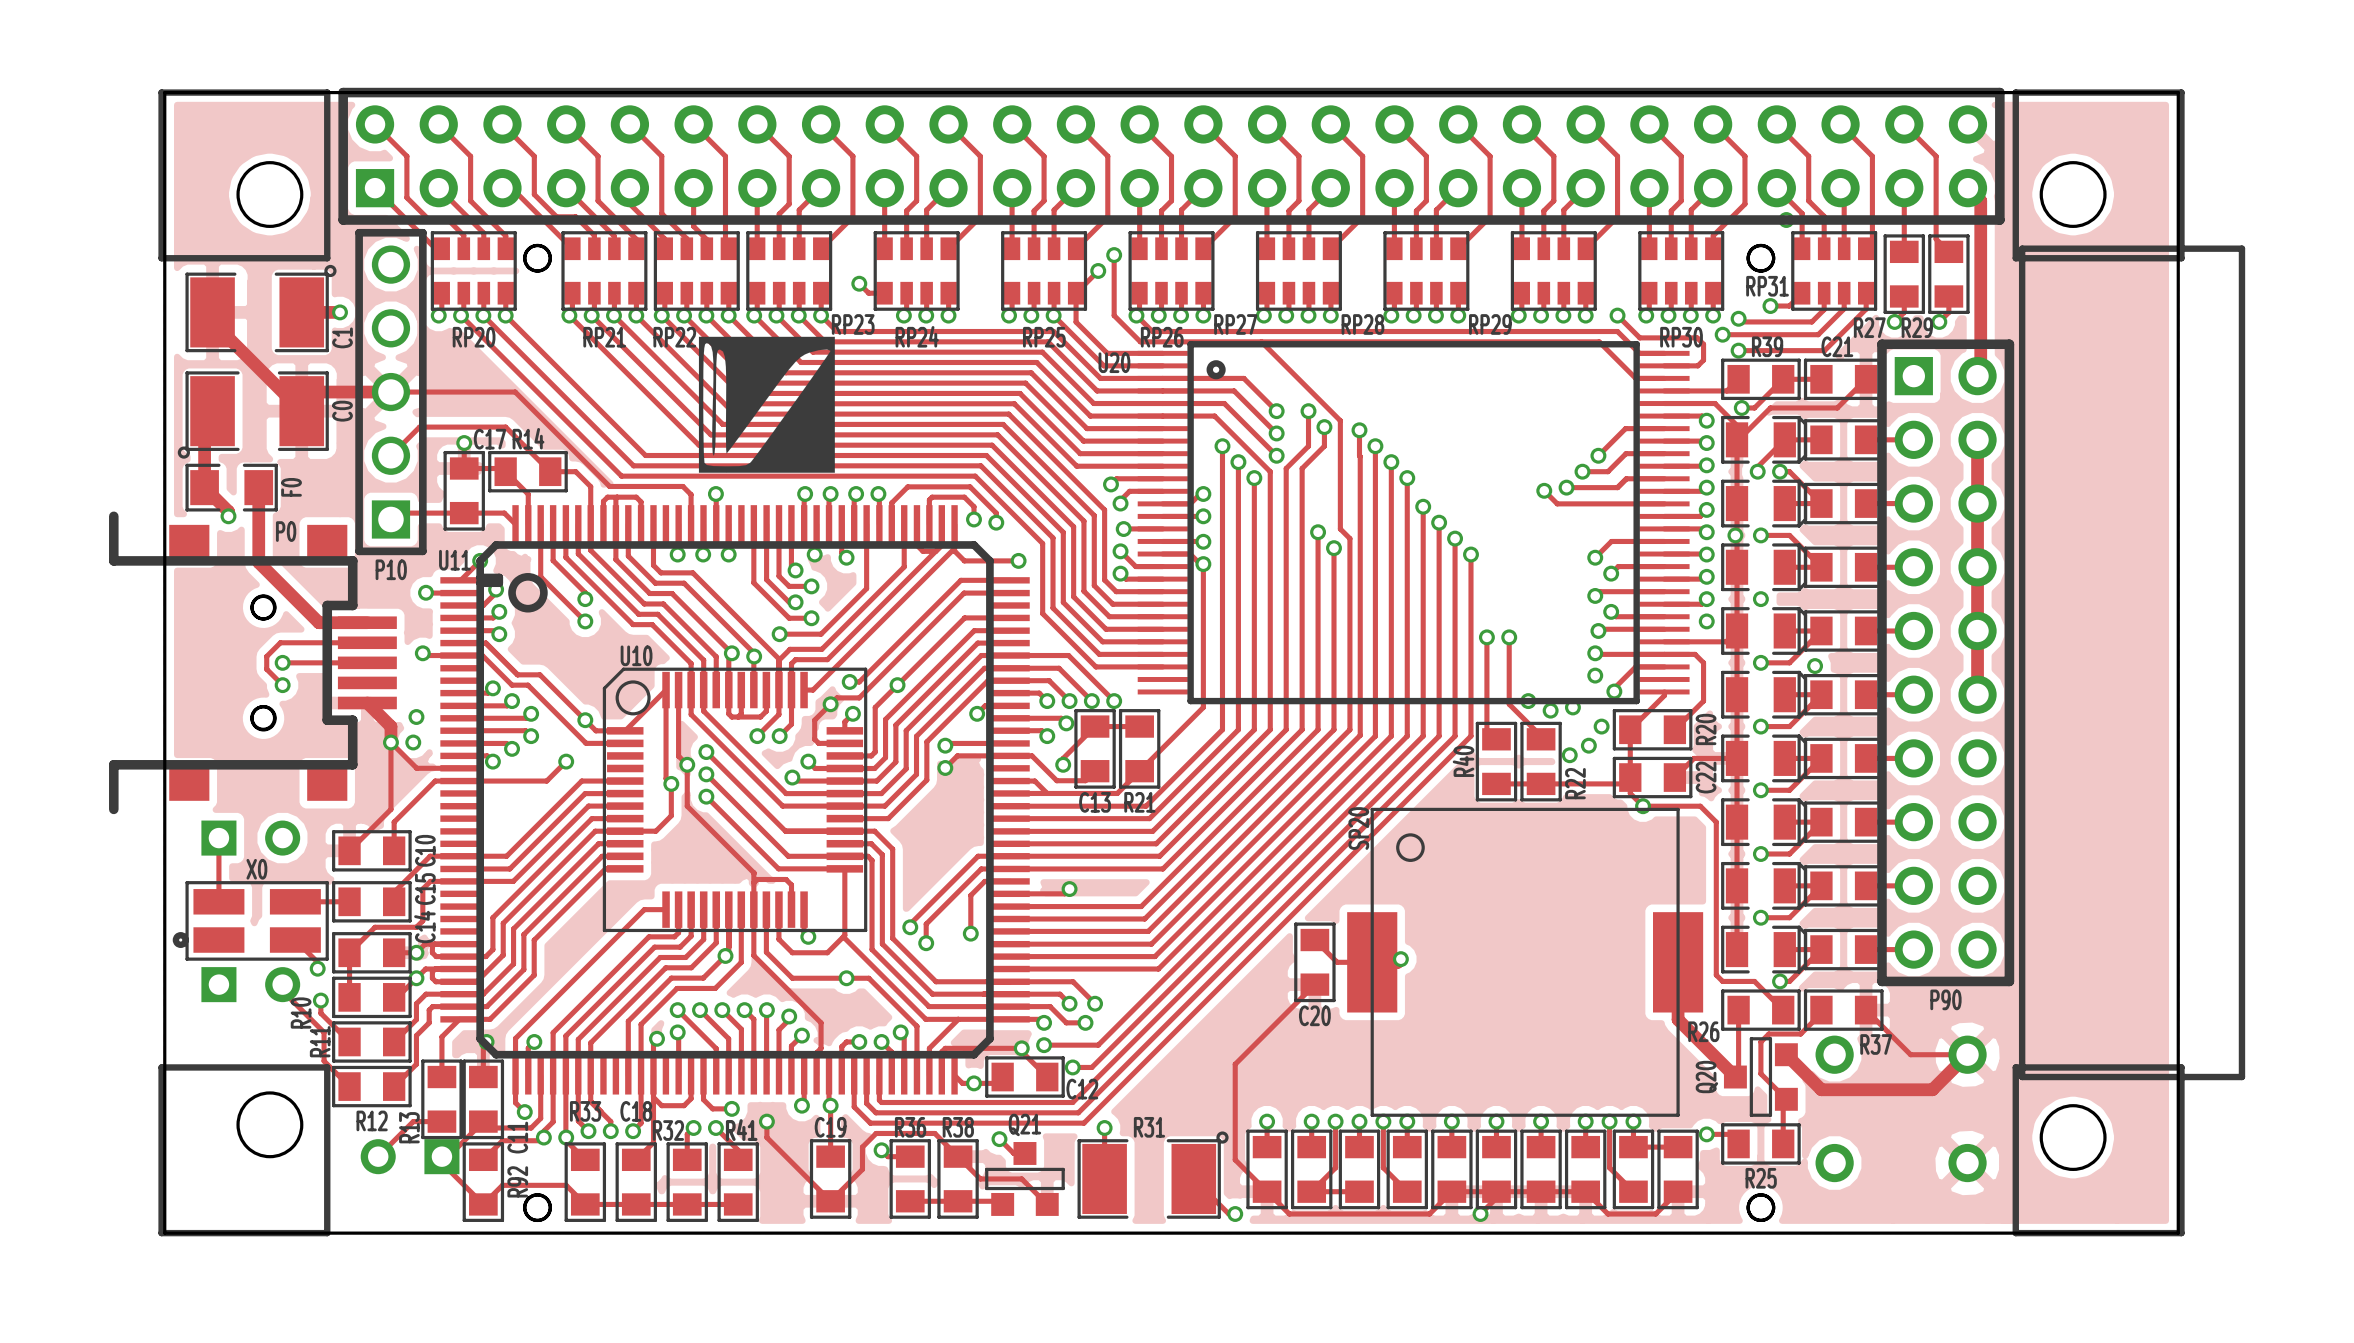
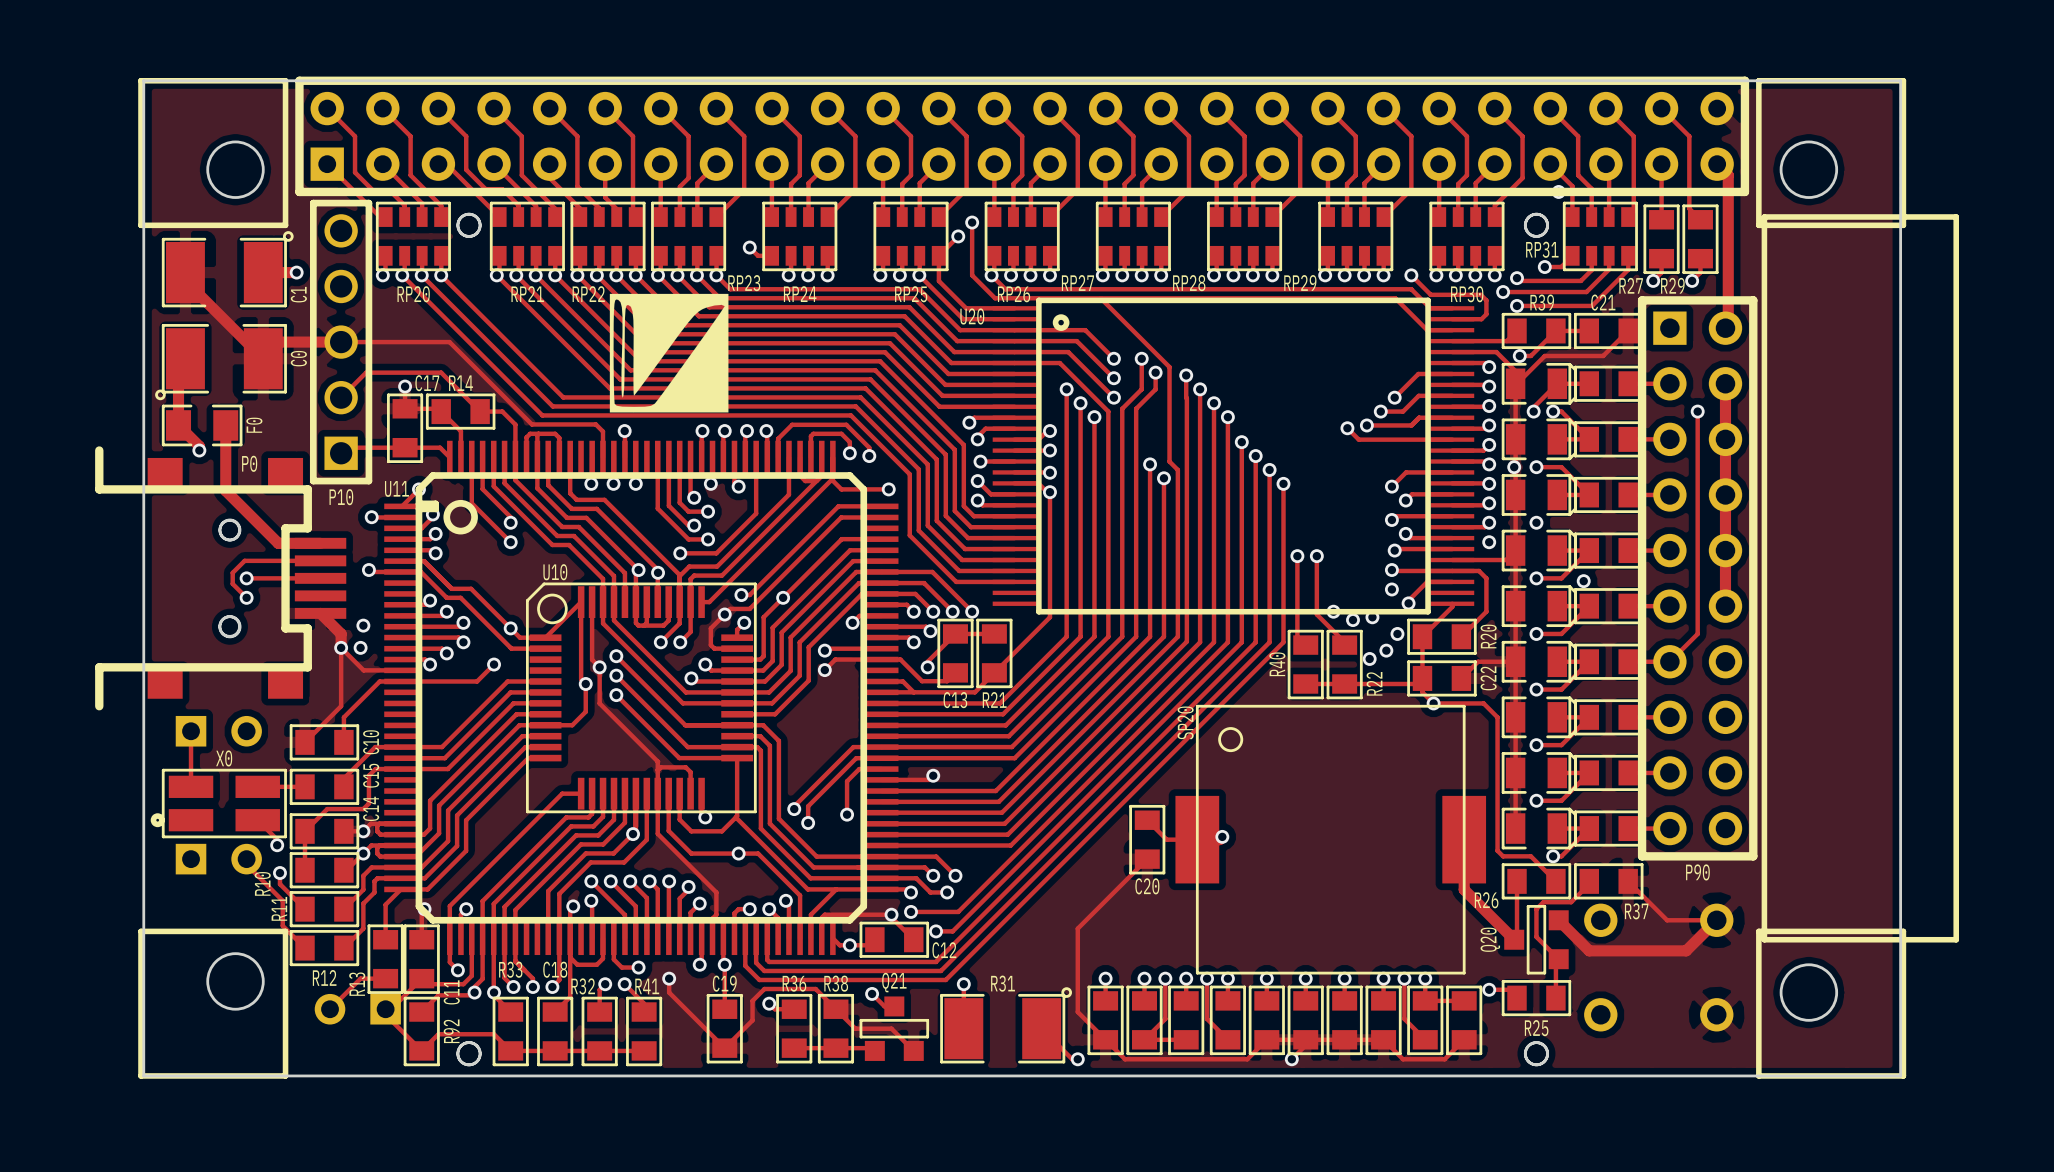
track: none -> (1697, 411) (1697, 633) (1669, 661)
via: none -> (1697, 411)

